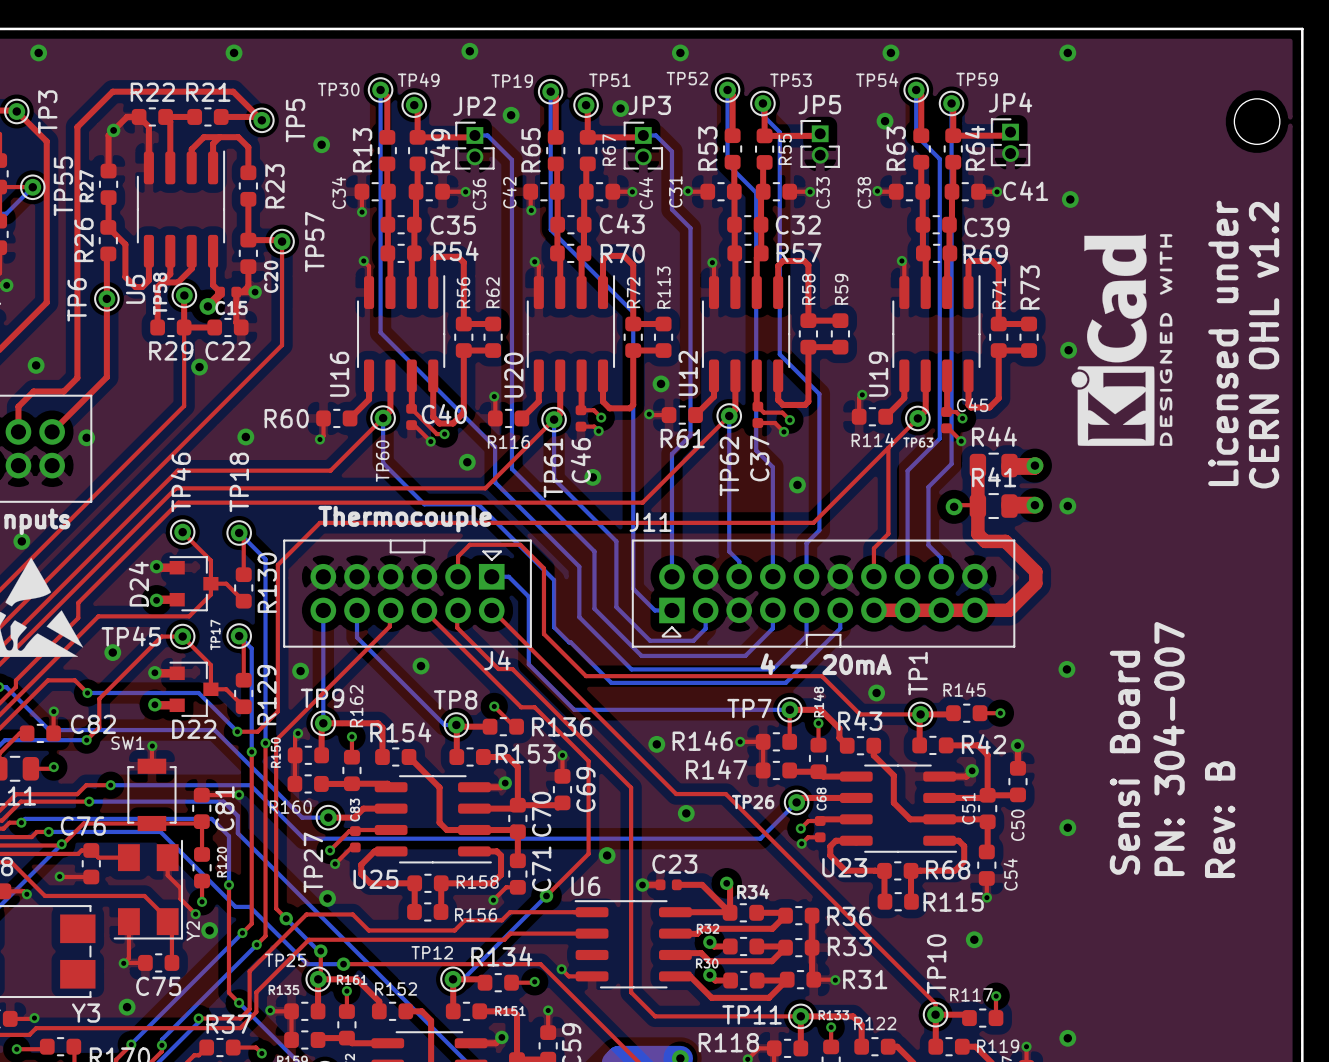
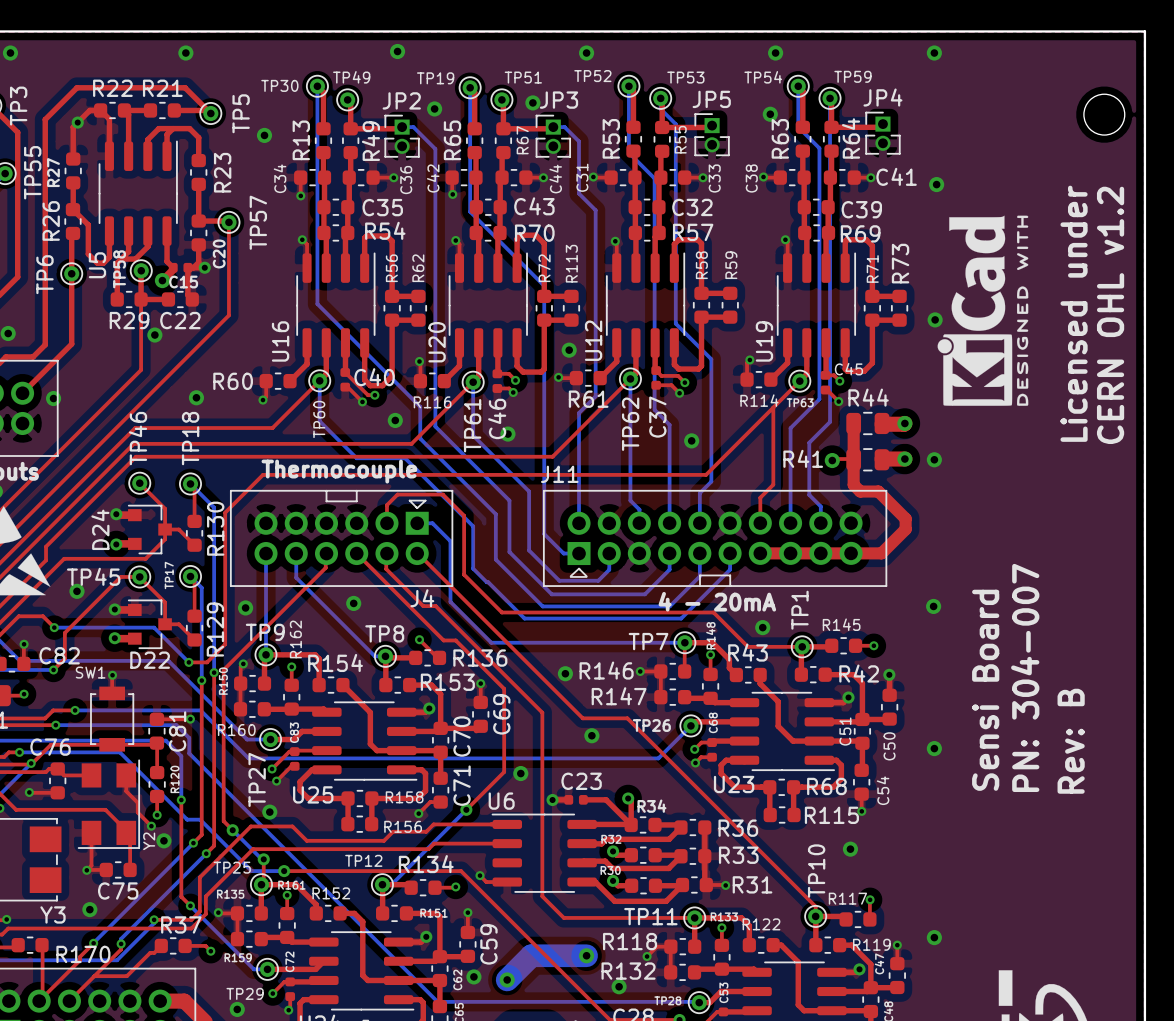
R41 name position: R41 (994, 477) -> R41 (803, 458)

